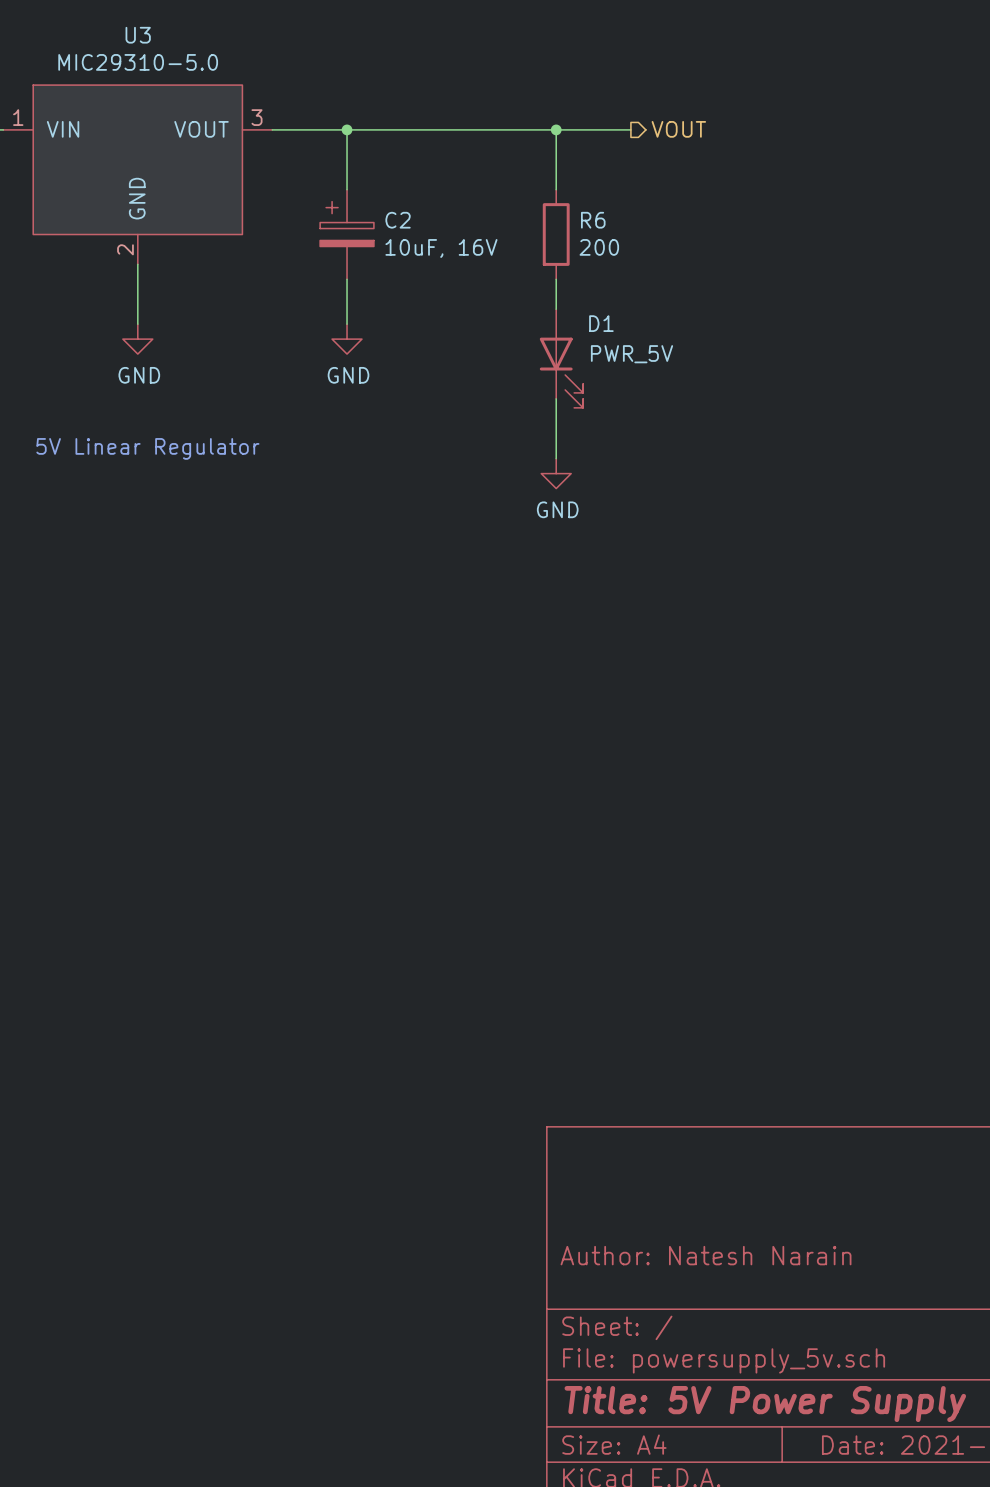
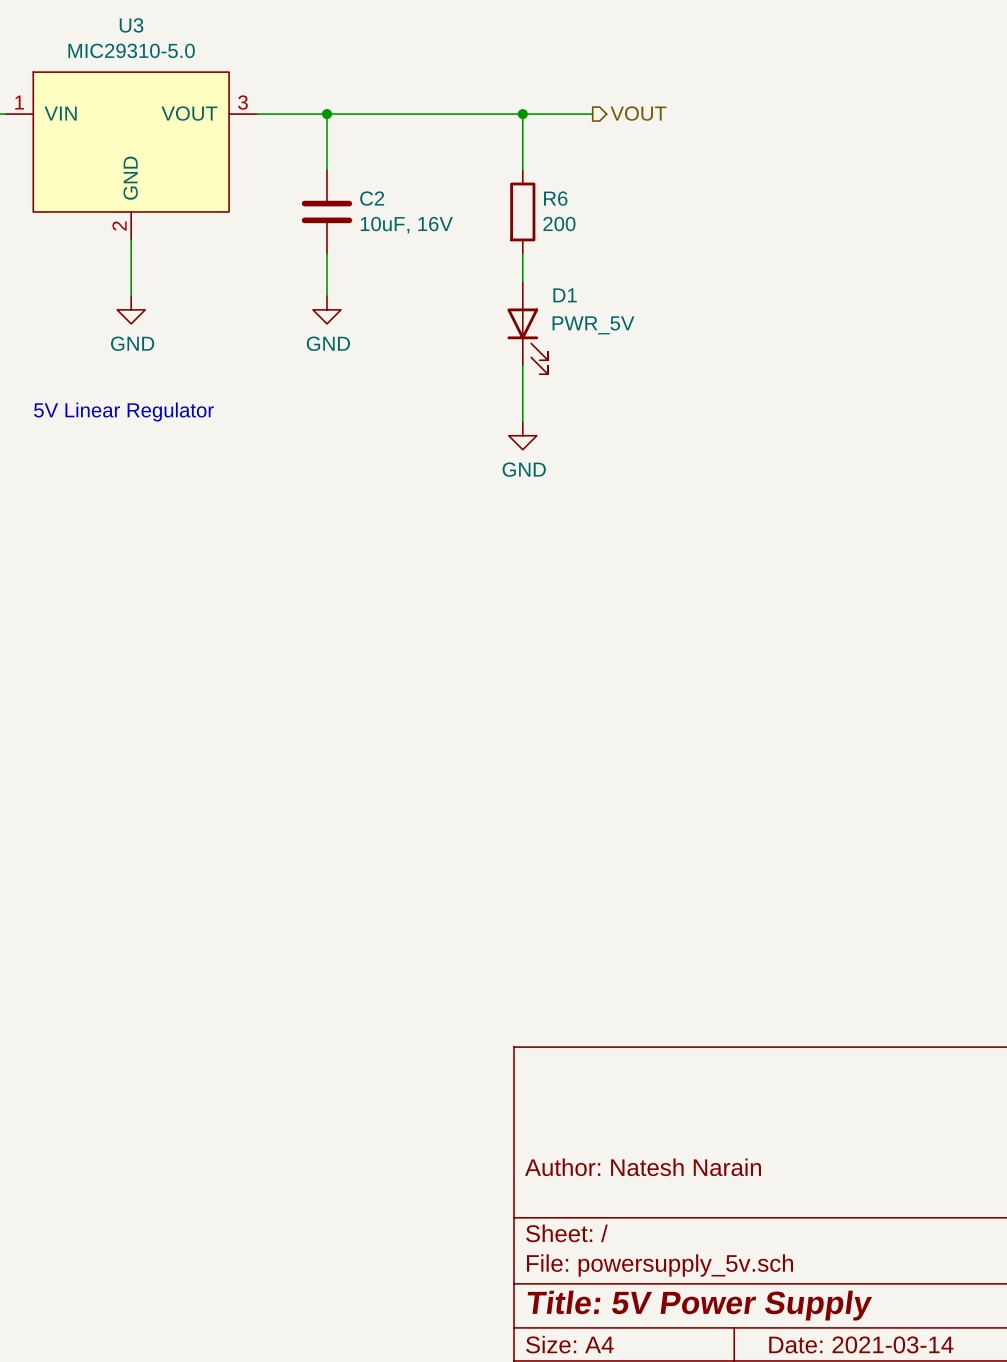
C2 symbol: [320, 189, 374, 280] -> [301, 170, 353, 254]

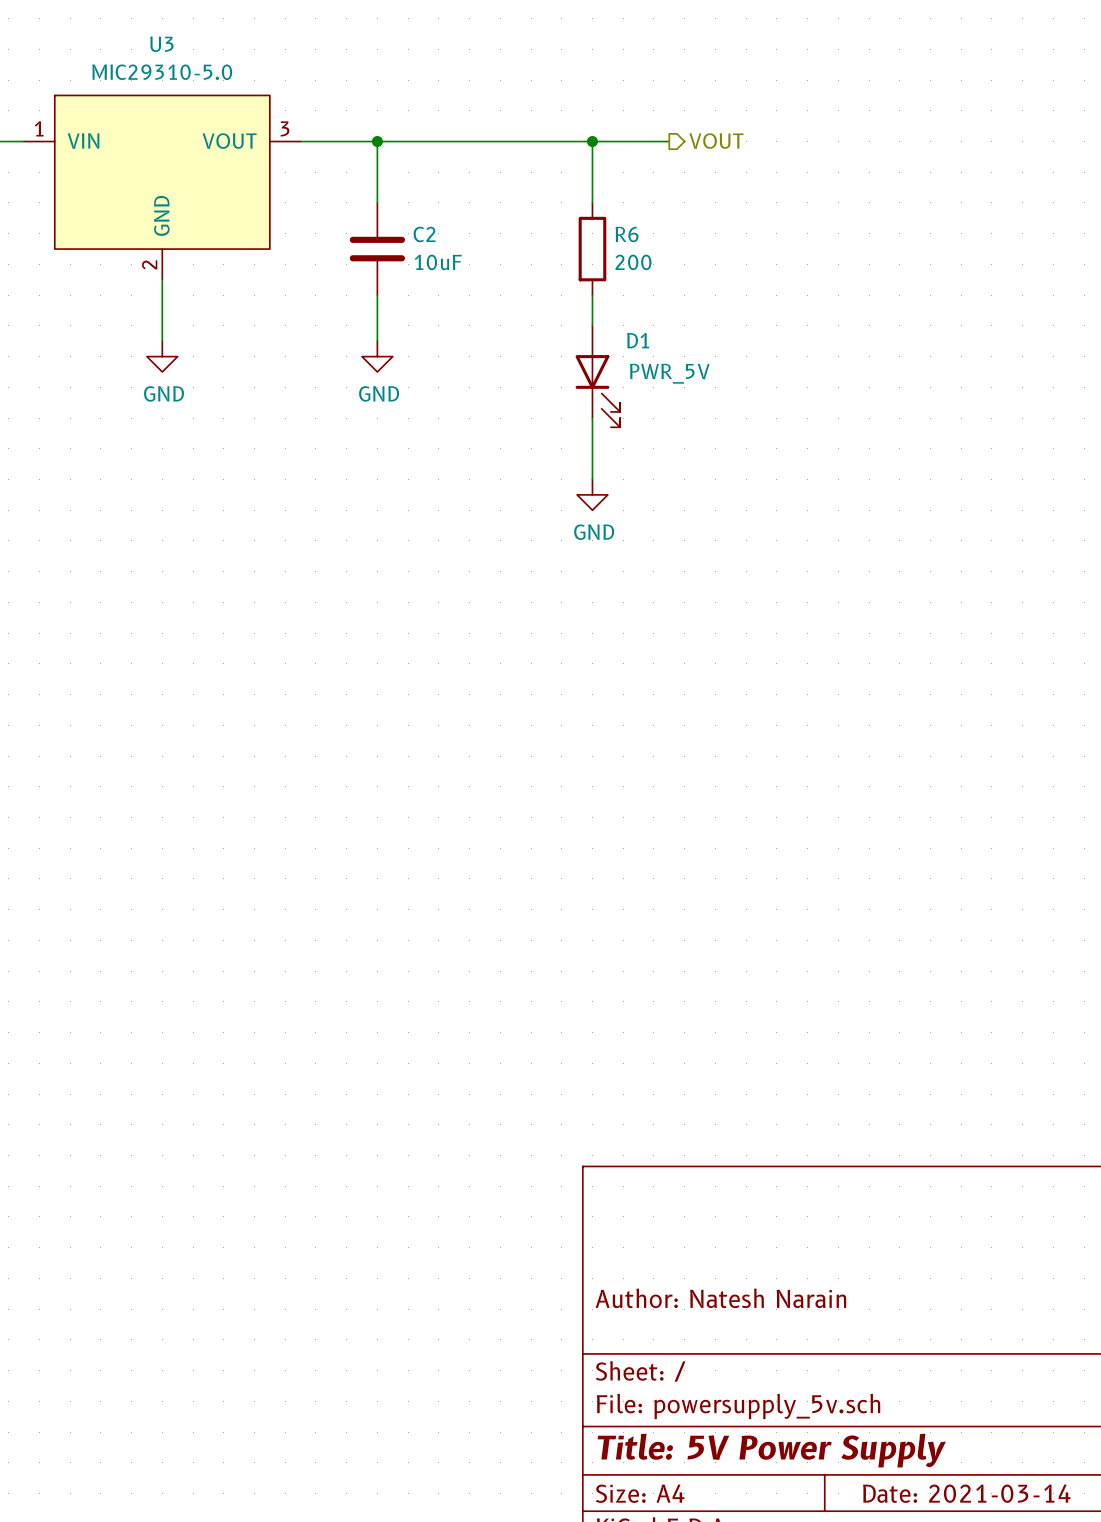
C2 value: 10uF, 16V (406, 225) -> 10uF (438, 262)
text: 5V Linear Regulator (123, 412) -> none

